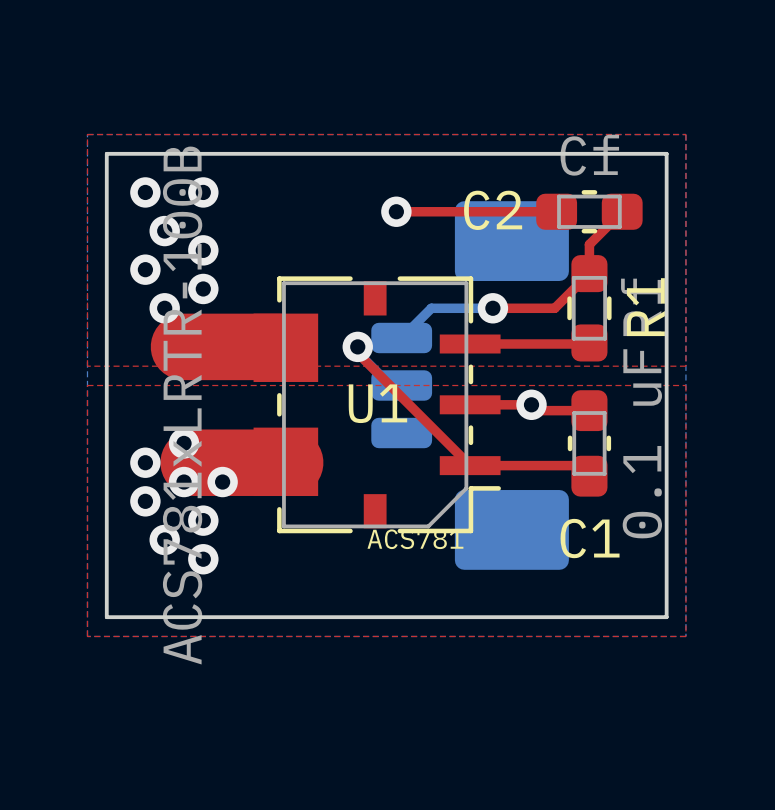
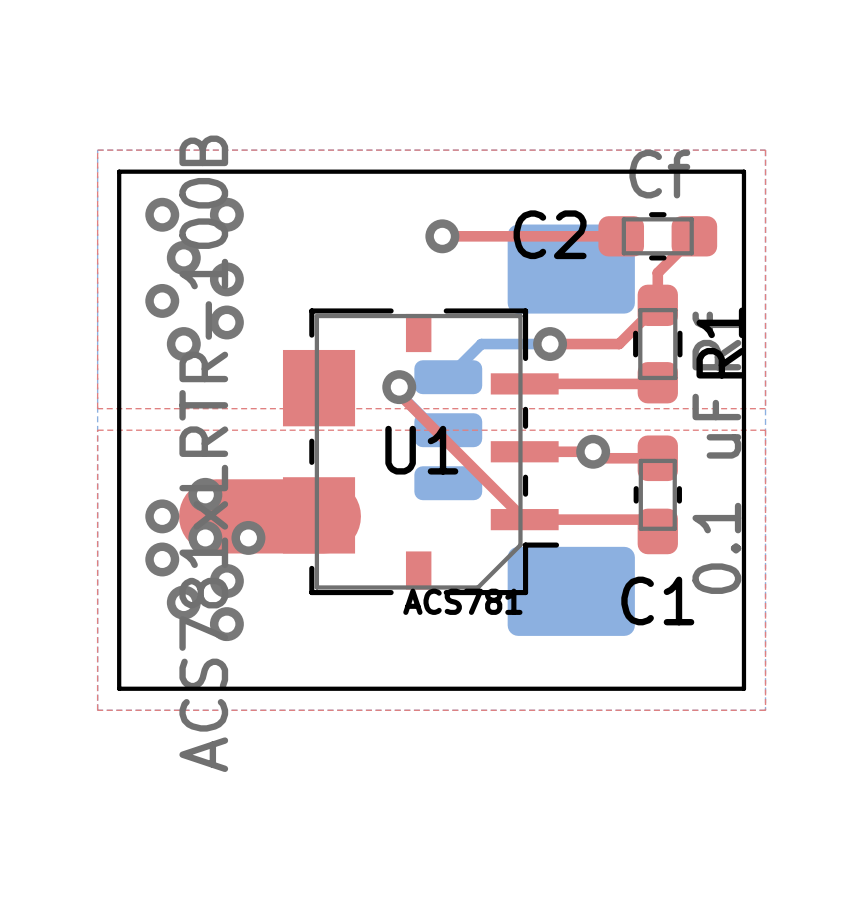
top track: (184, 346) (280, 346) -> none

